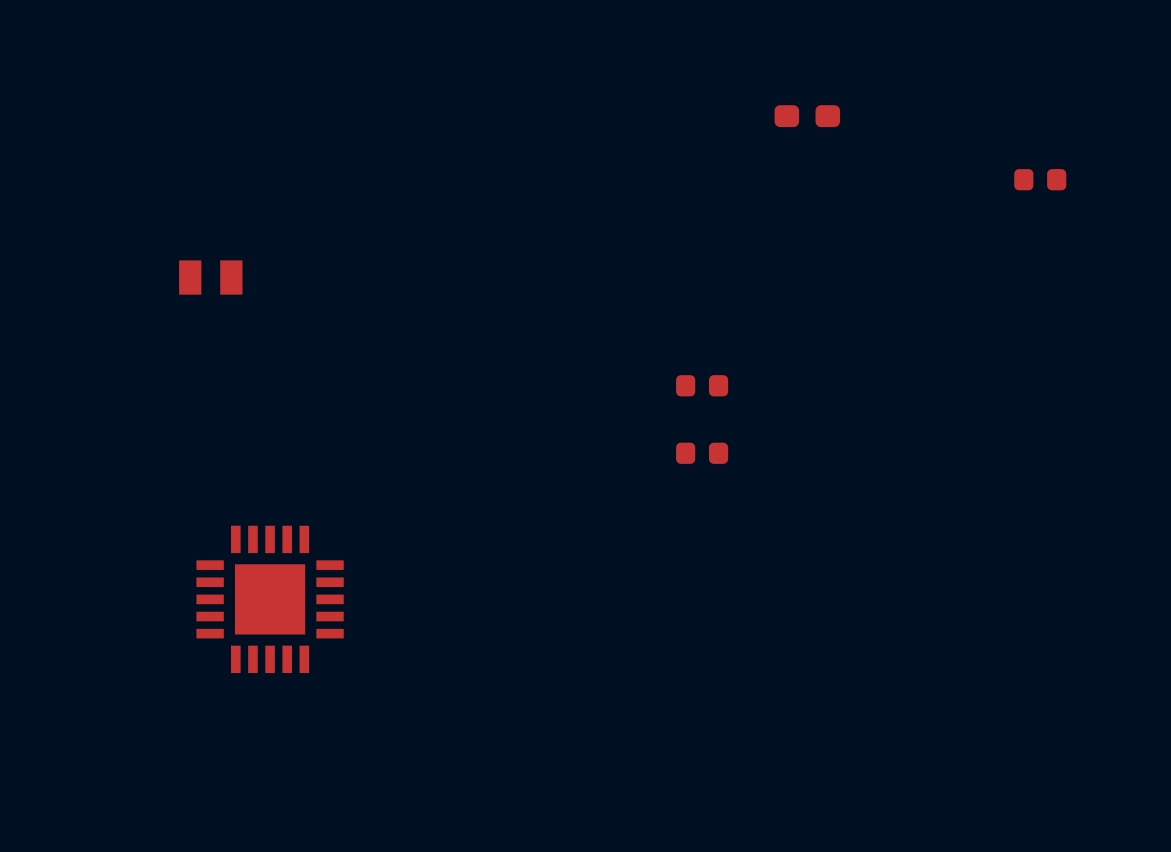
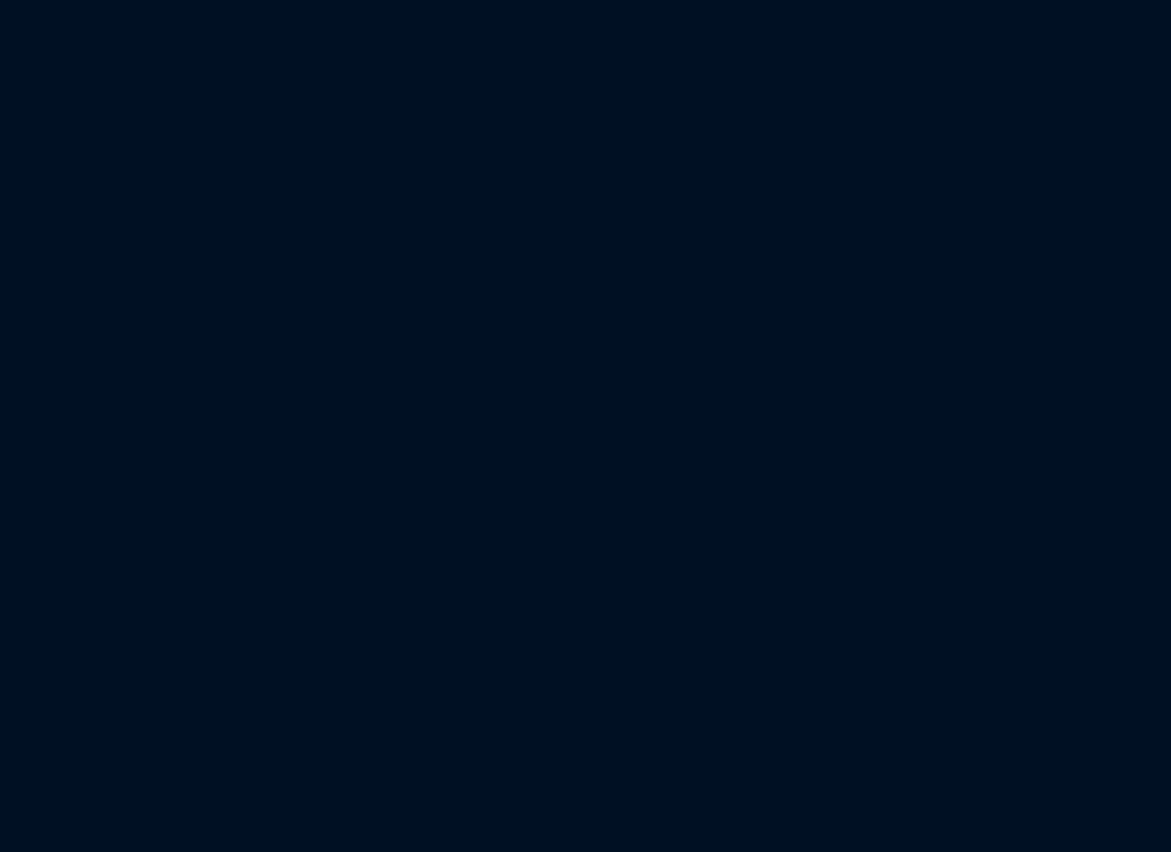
part: (807, 116) -> none
part: (1040, 179) -> none
part: (210, 277) -> none
part: (702, 385) -> none
part: (702, 453) -> none
part: (270, 599) -> none

